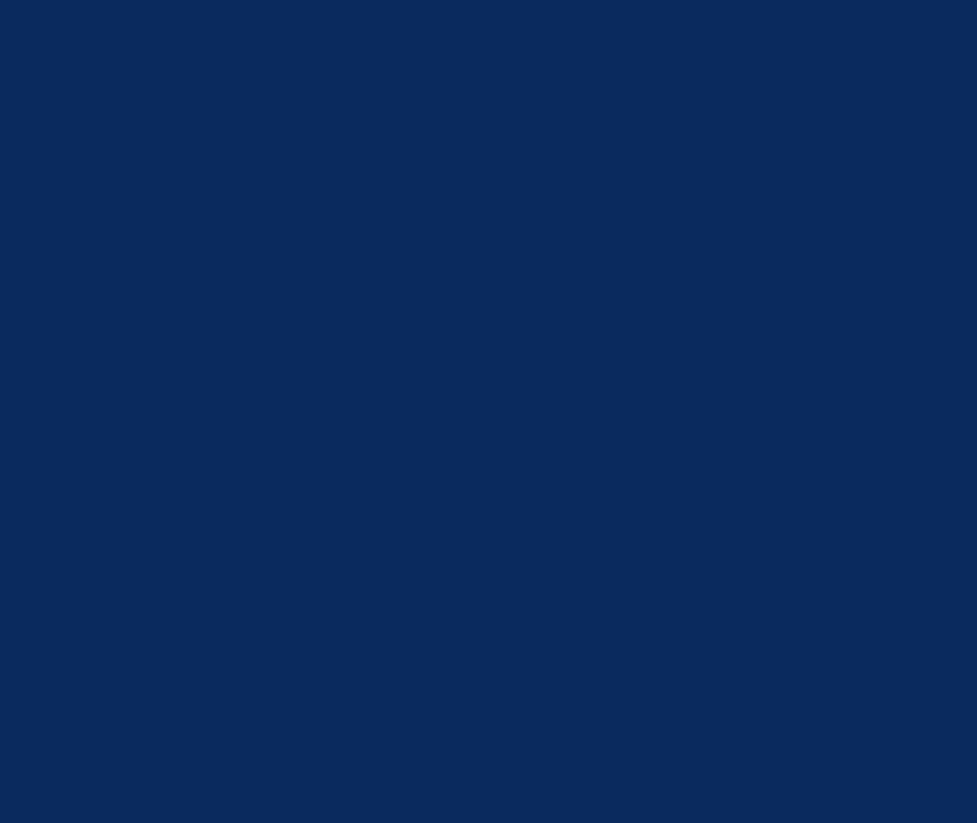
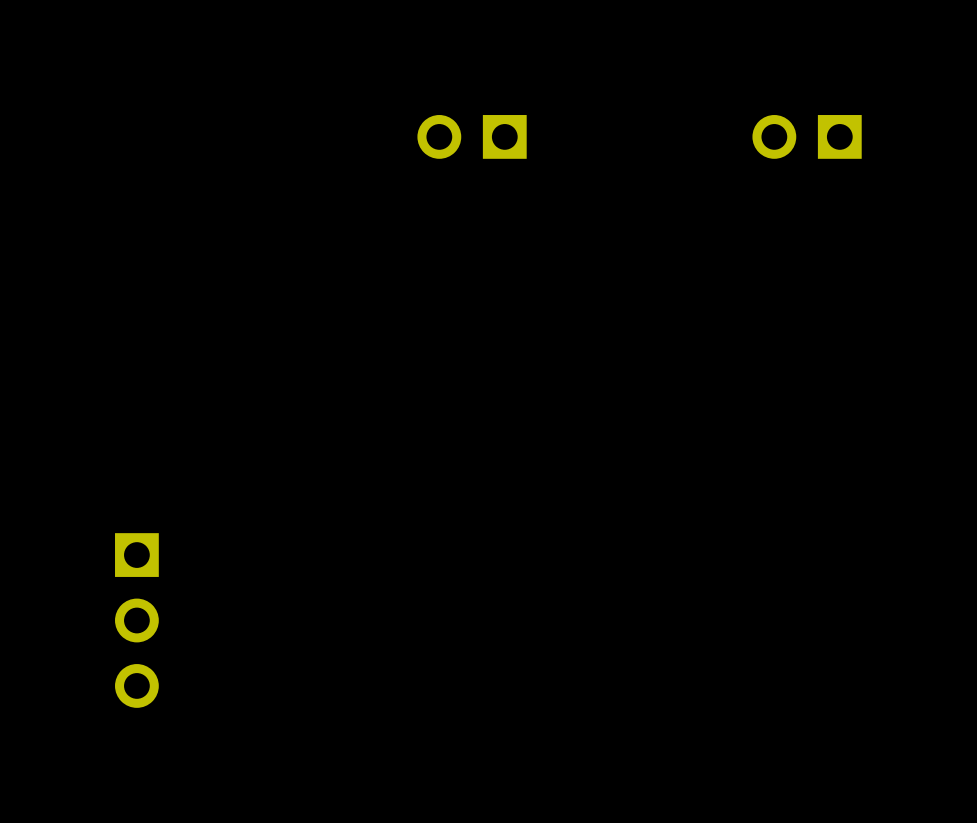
part: none -> (472, 136)
part: none -> (807, 136)
part: none -> (136, 620)

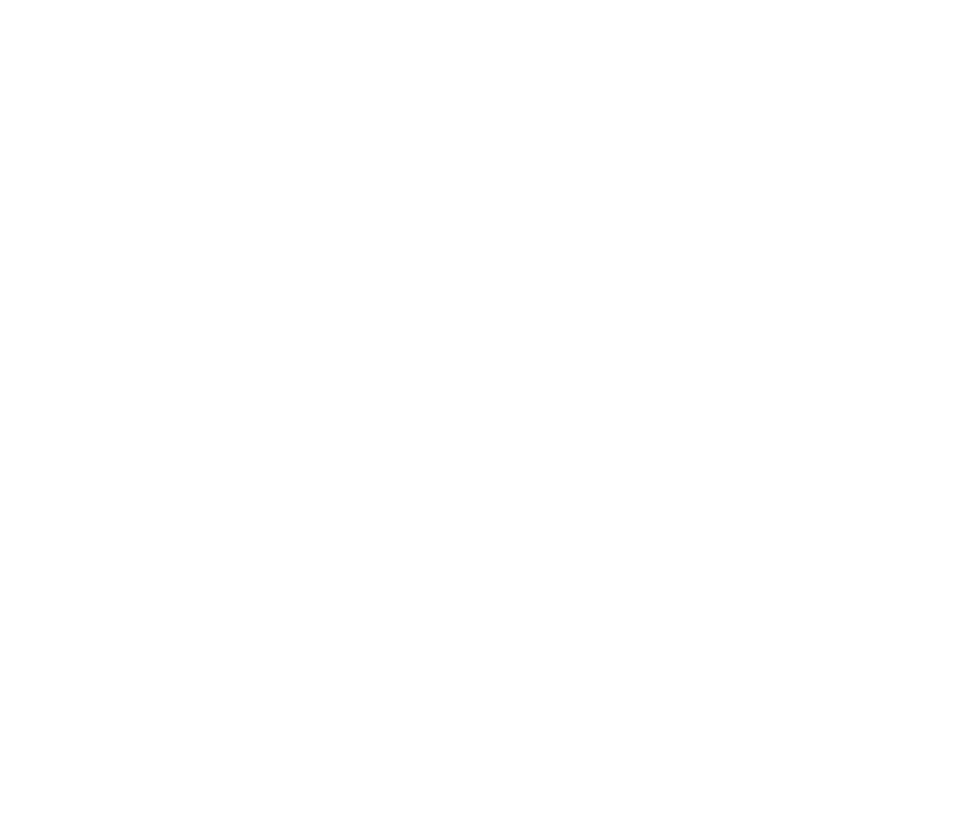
part: (472, 136) -> none
part: (807, 136) -> none
part: (136, 620) -> none

